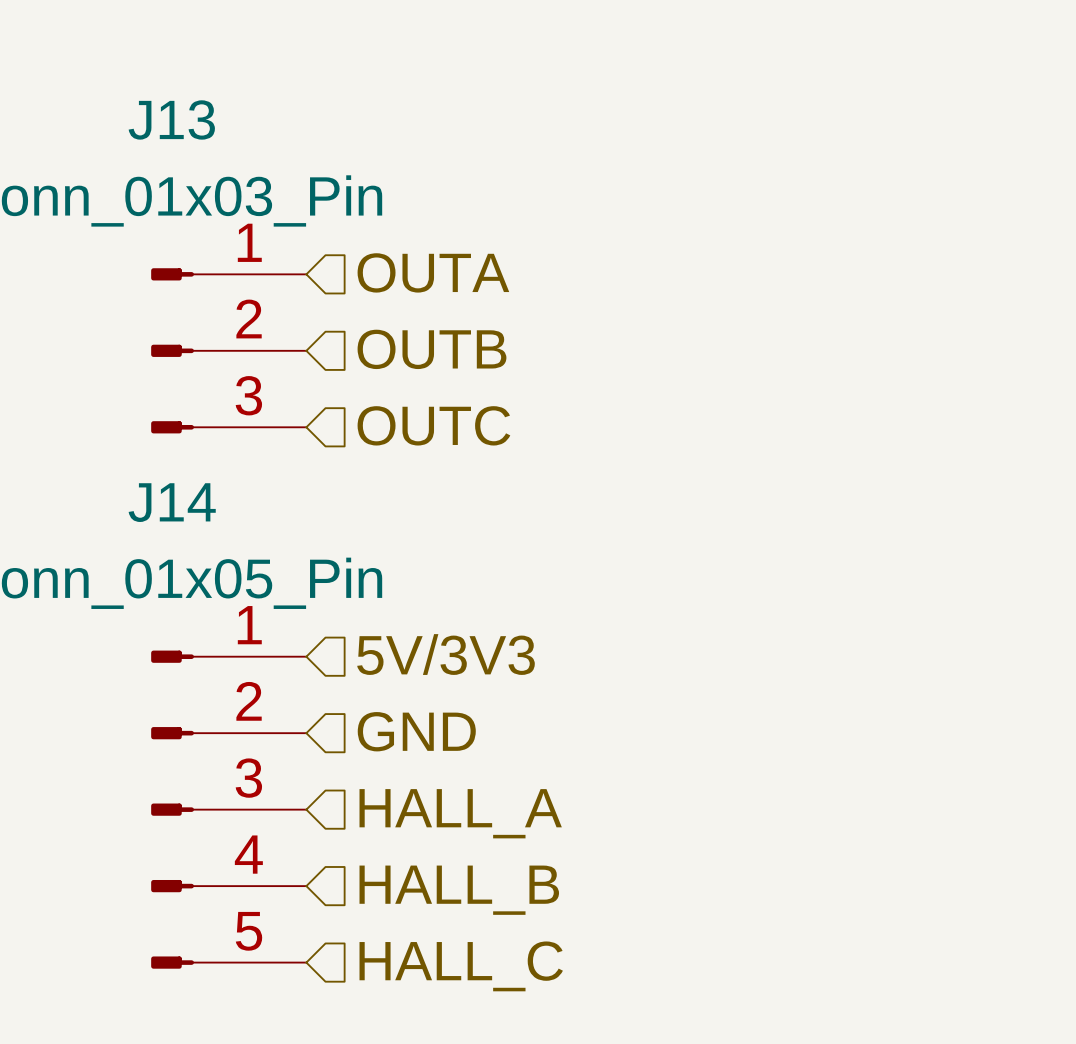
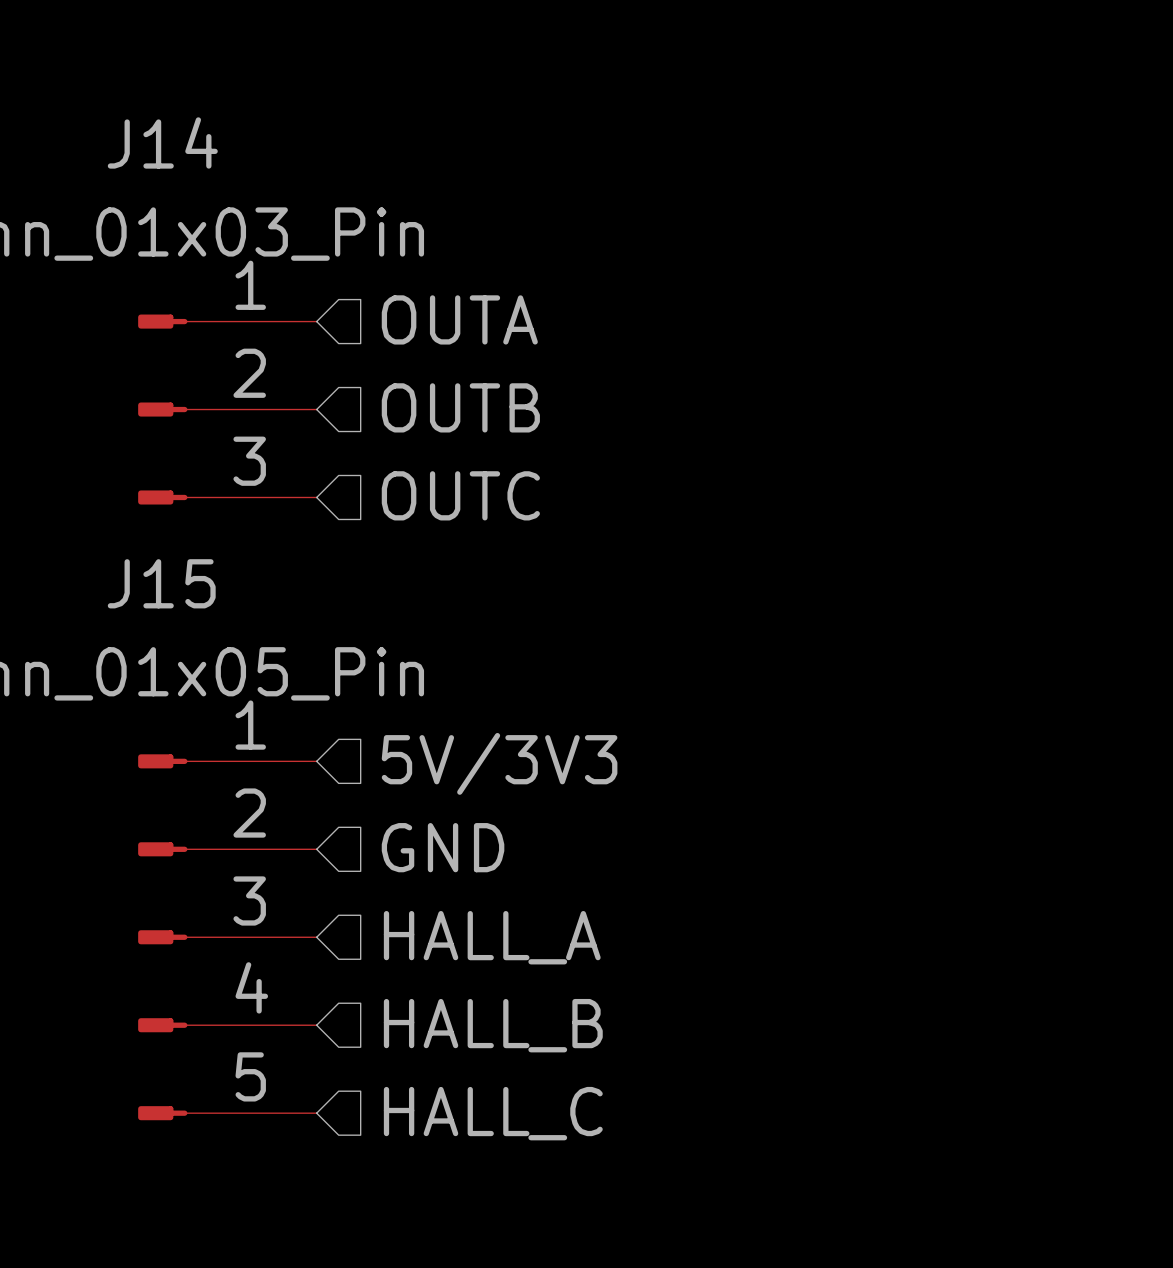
J13 name: J13 (171, 119) -> J14 (162, 142)
J14 name: J14 (172, 502) -> J15 (161, 583)

